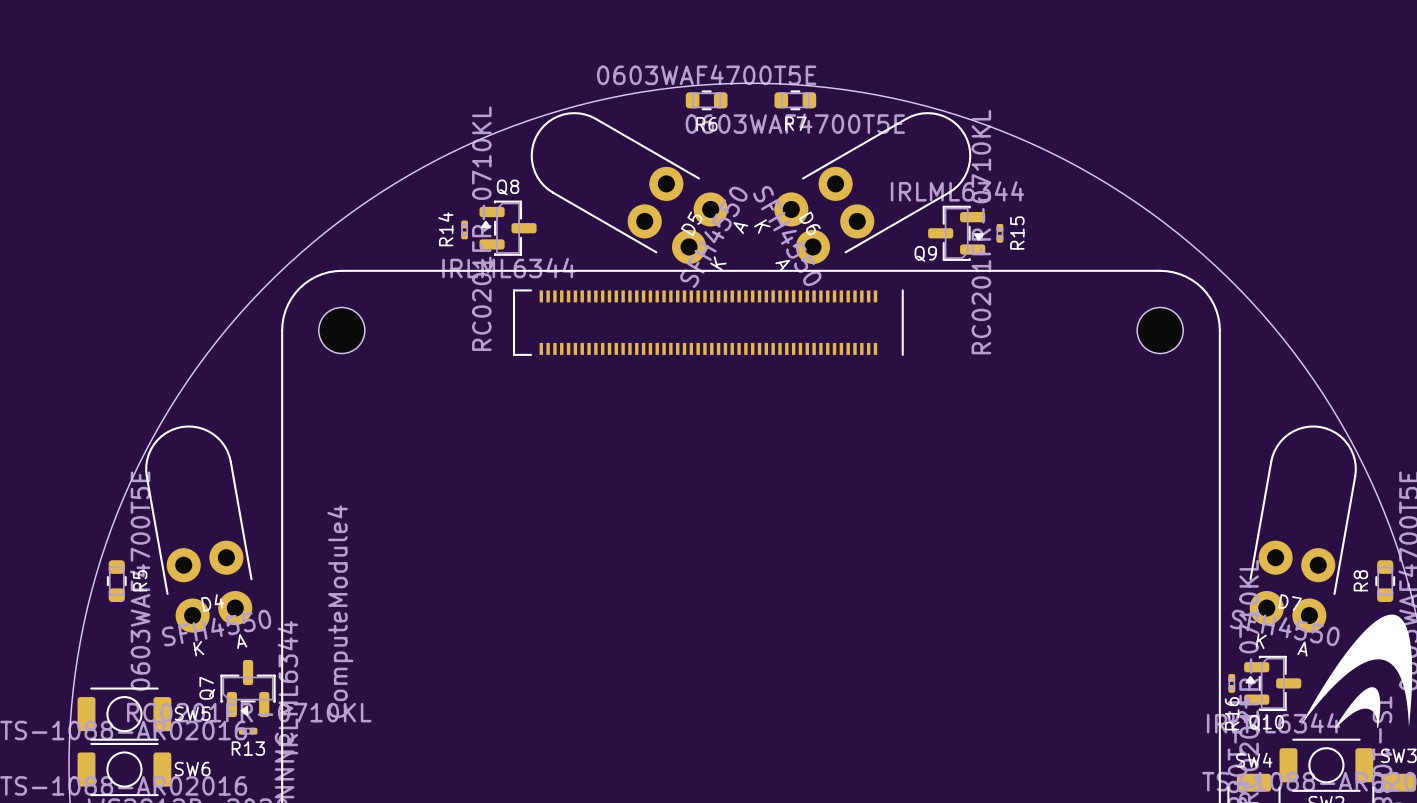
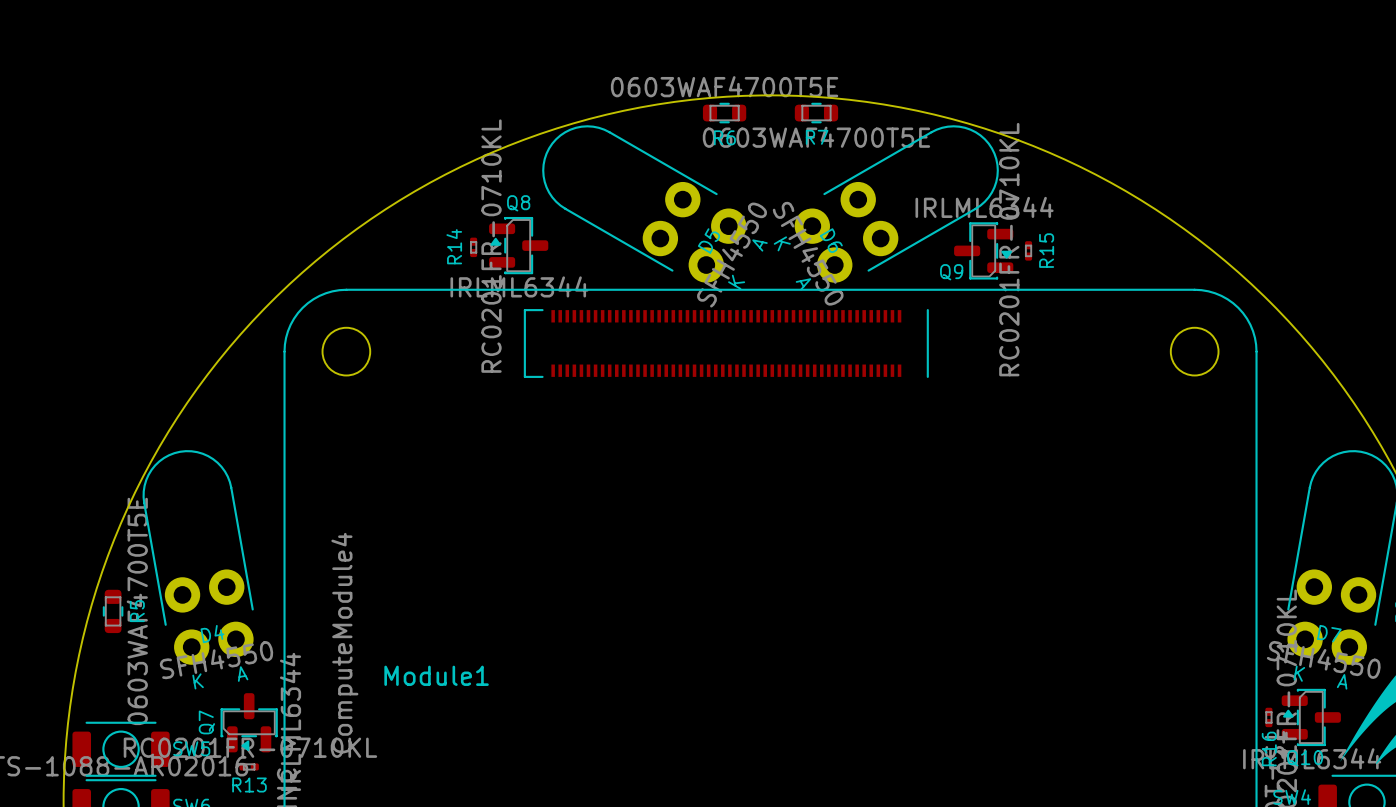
Module1 name: none -> Module1 (436, 675)

